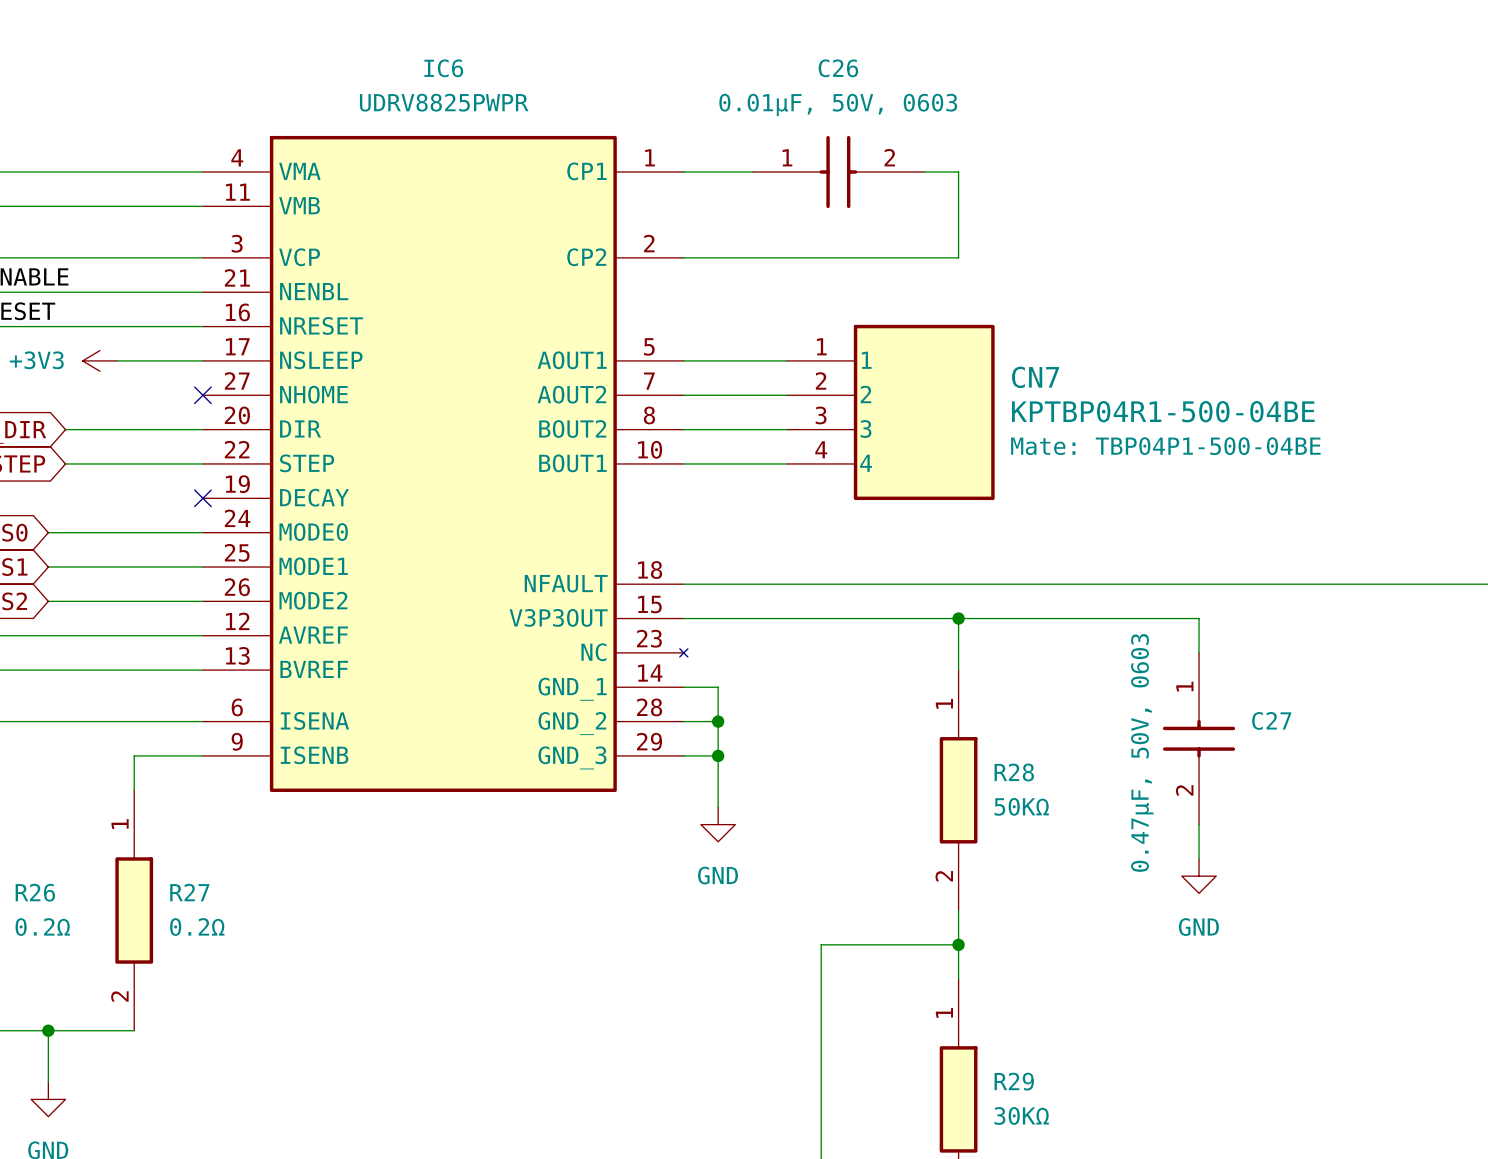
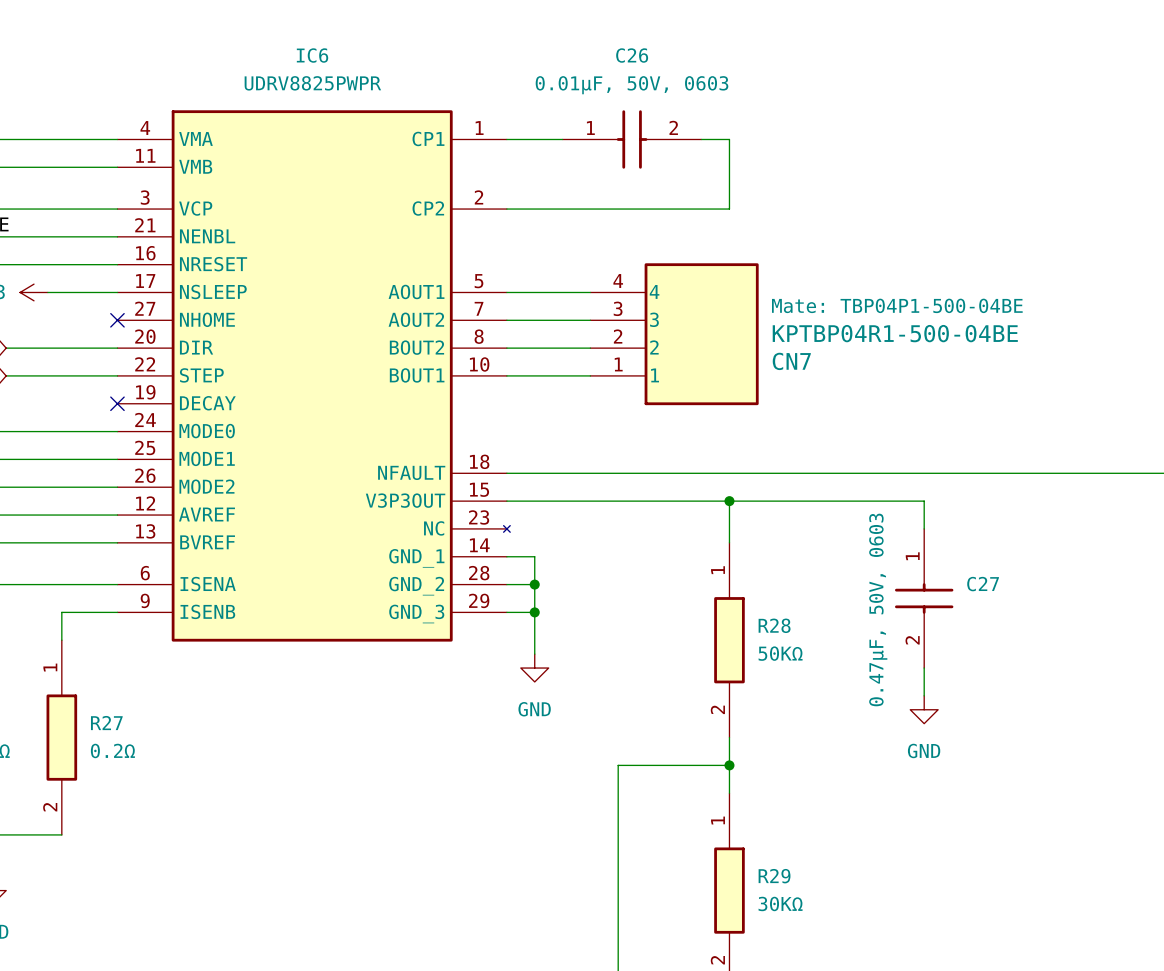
CN7 flip: as is (924, 412) -> up-down (701, 334)

